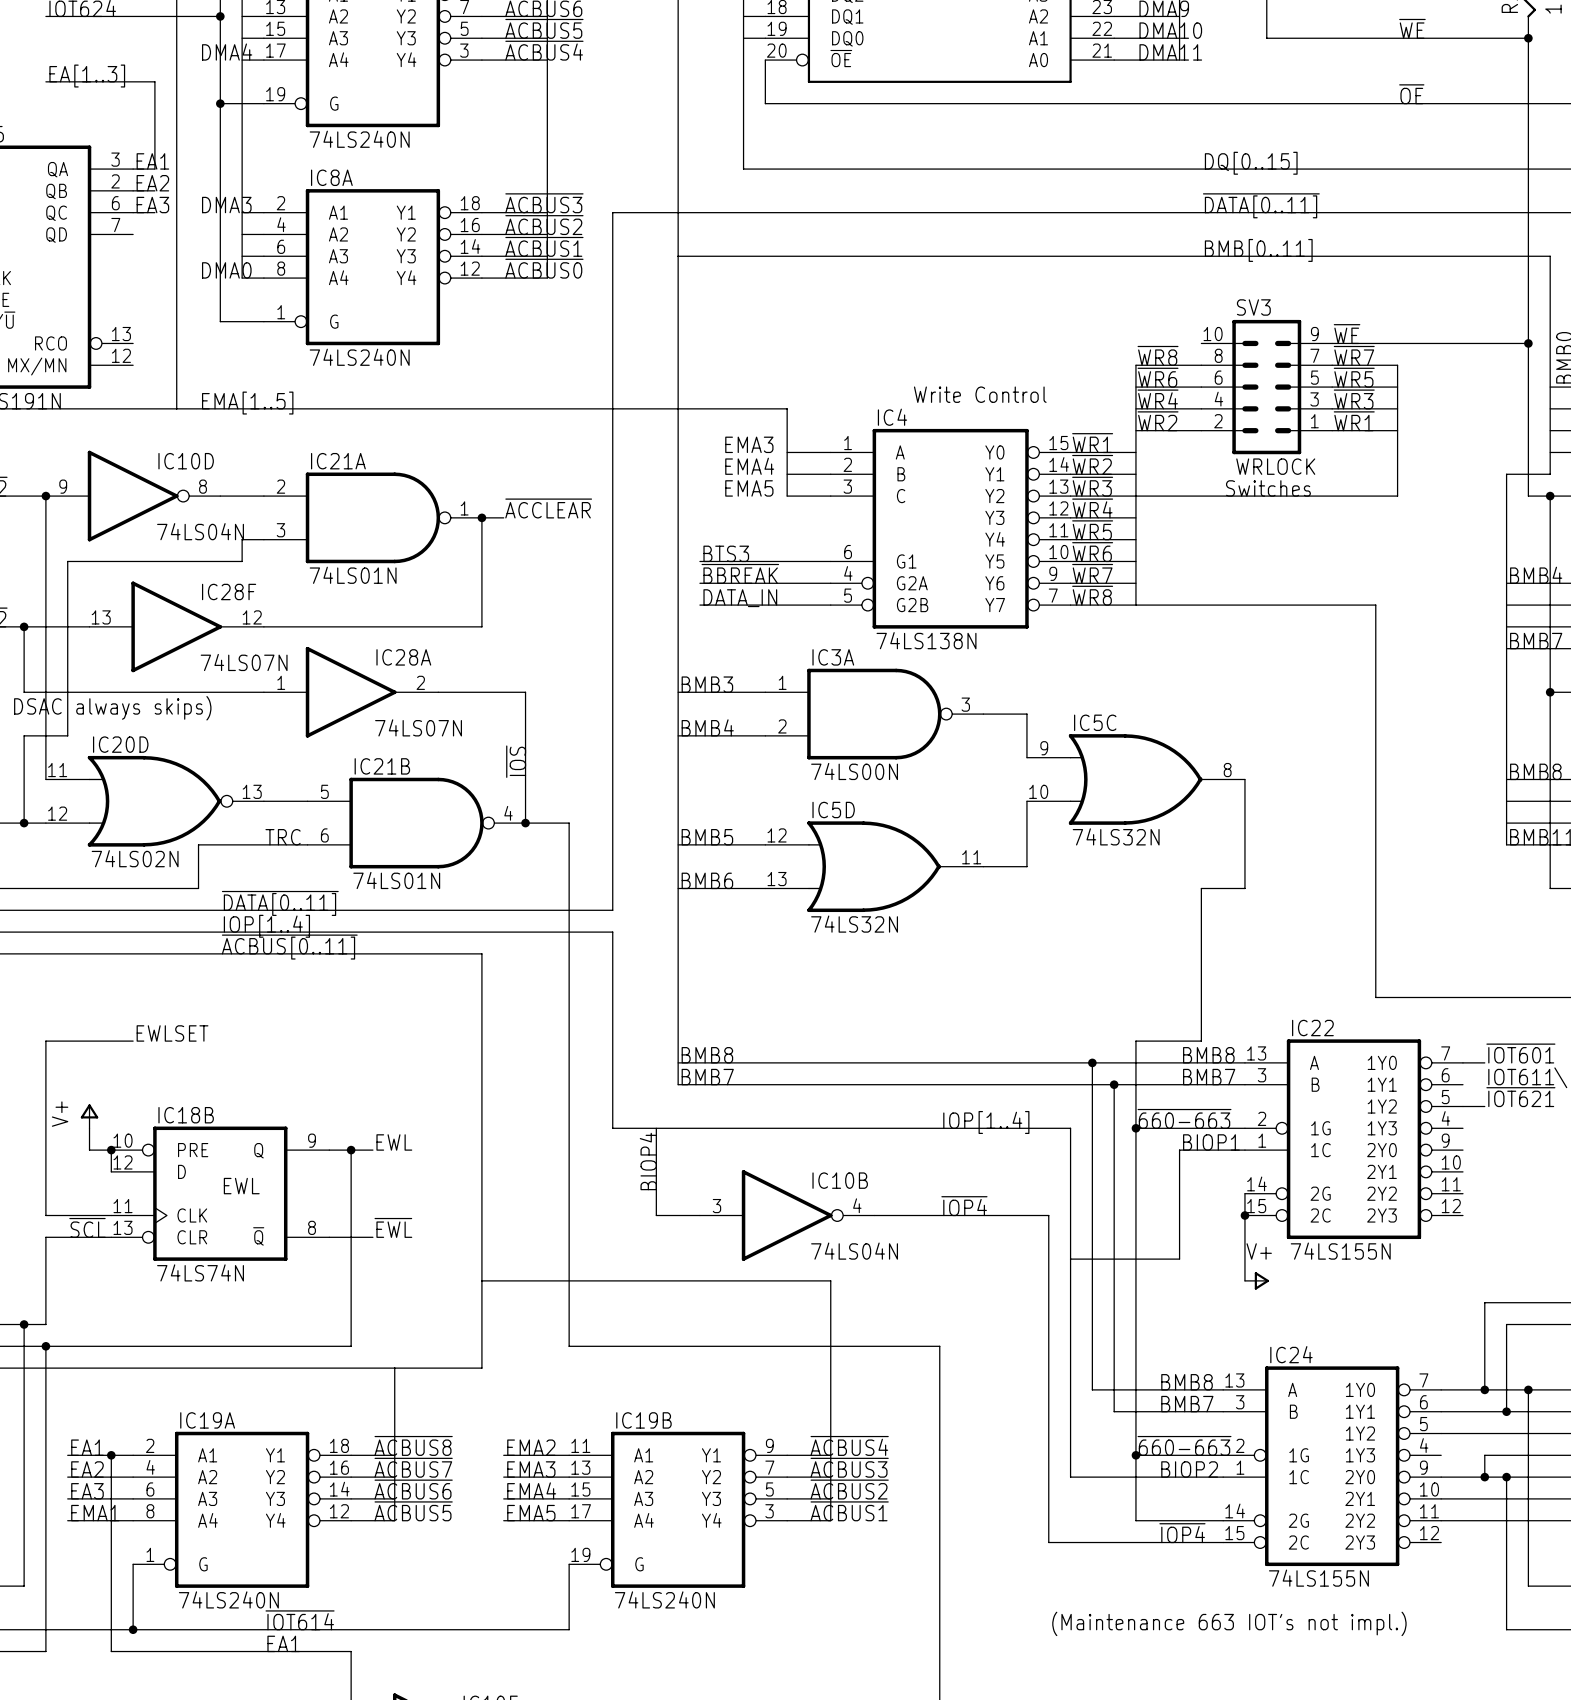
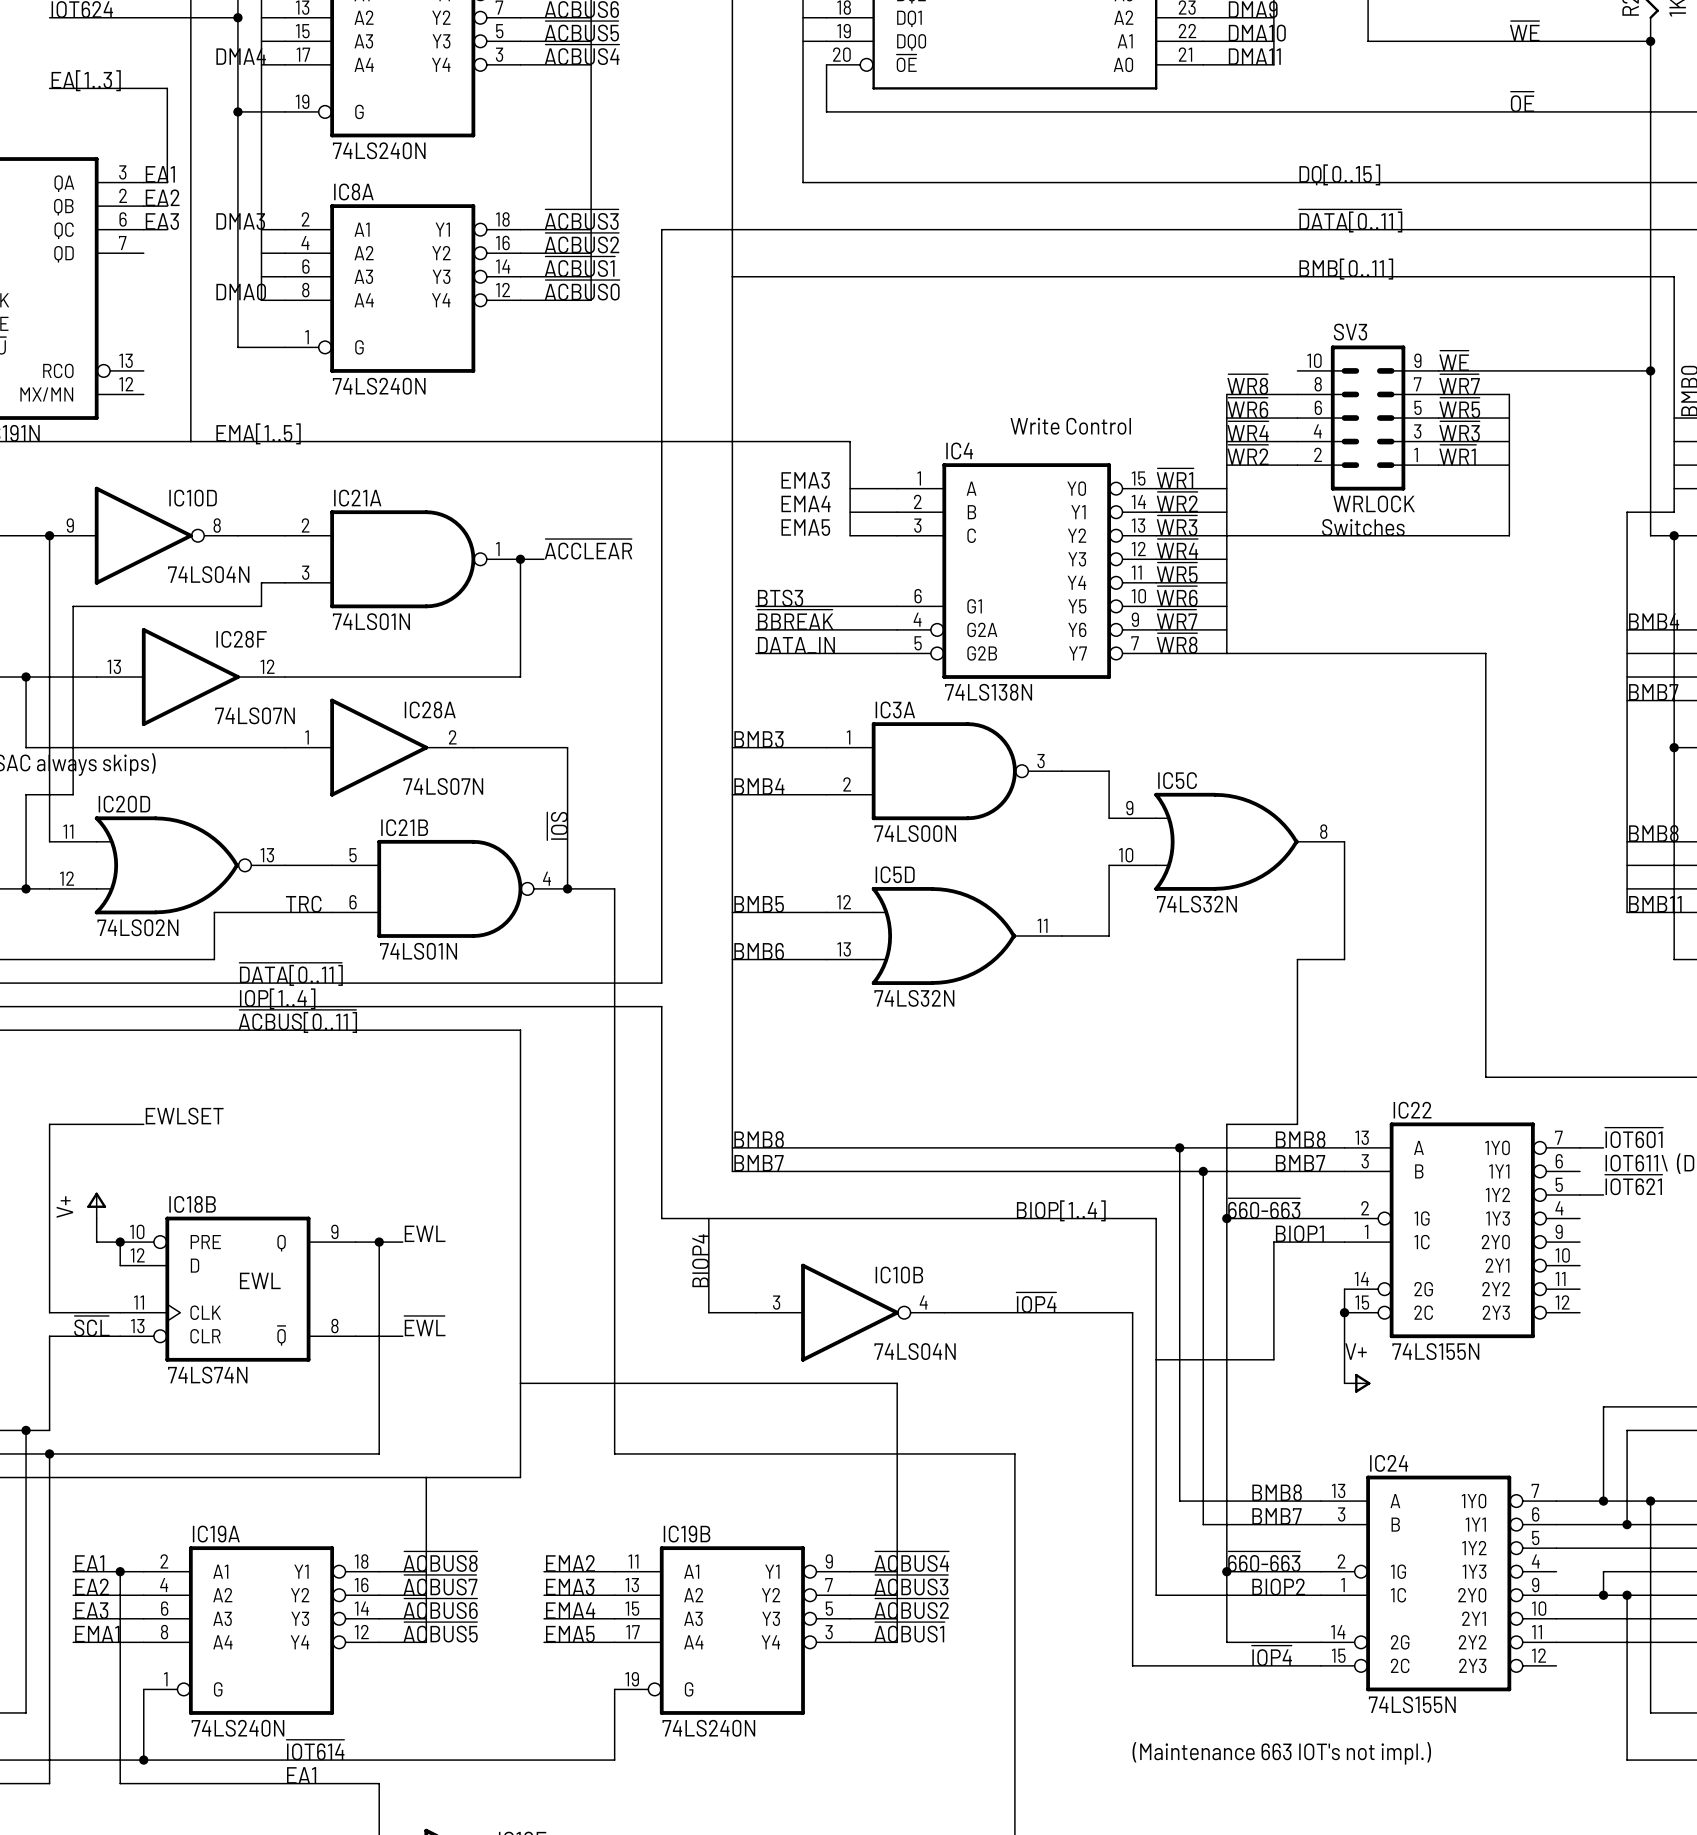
label: IOP[1..4] (986, 1122) -> BIOP[1..4] (1061, 1210)

